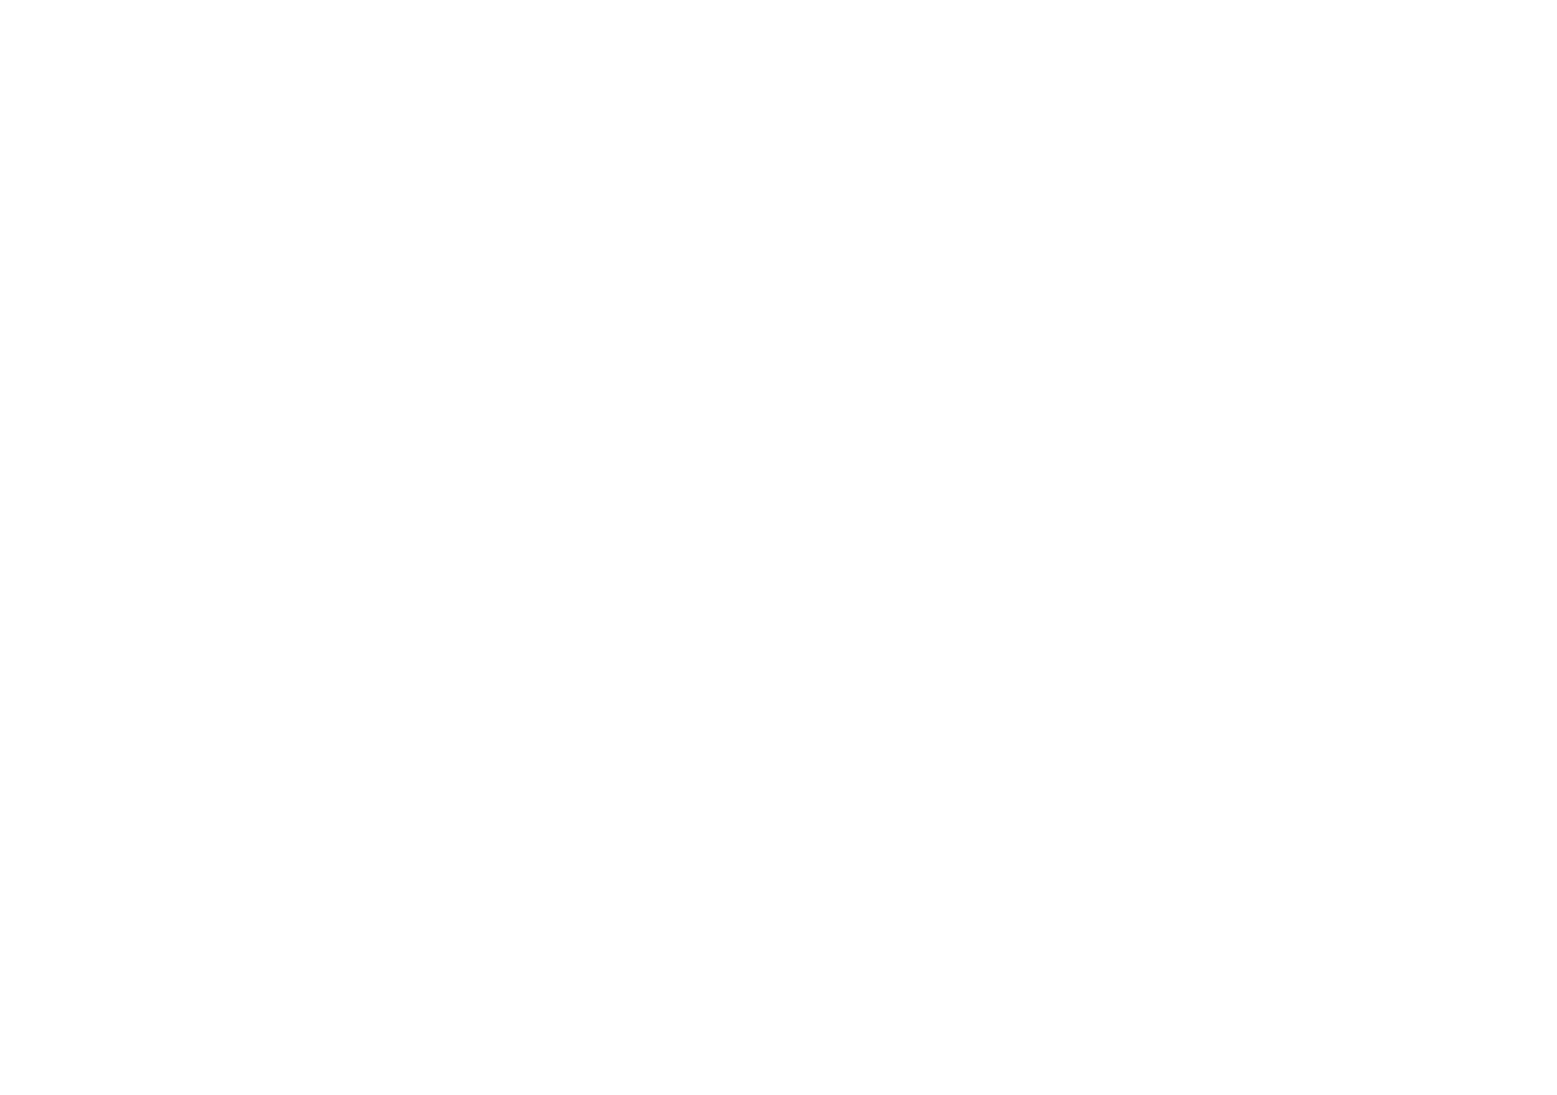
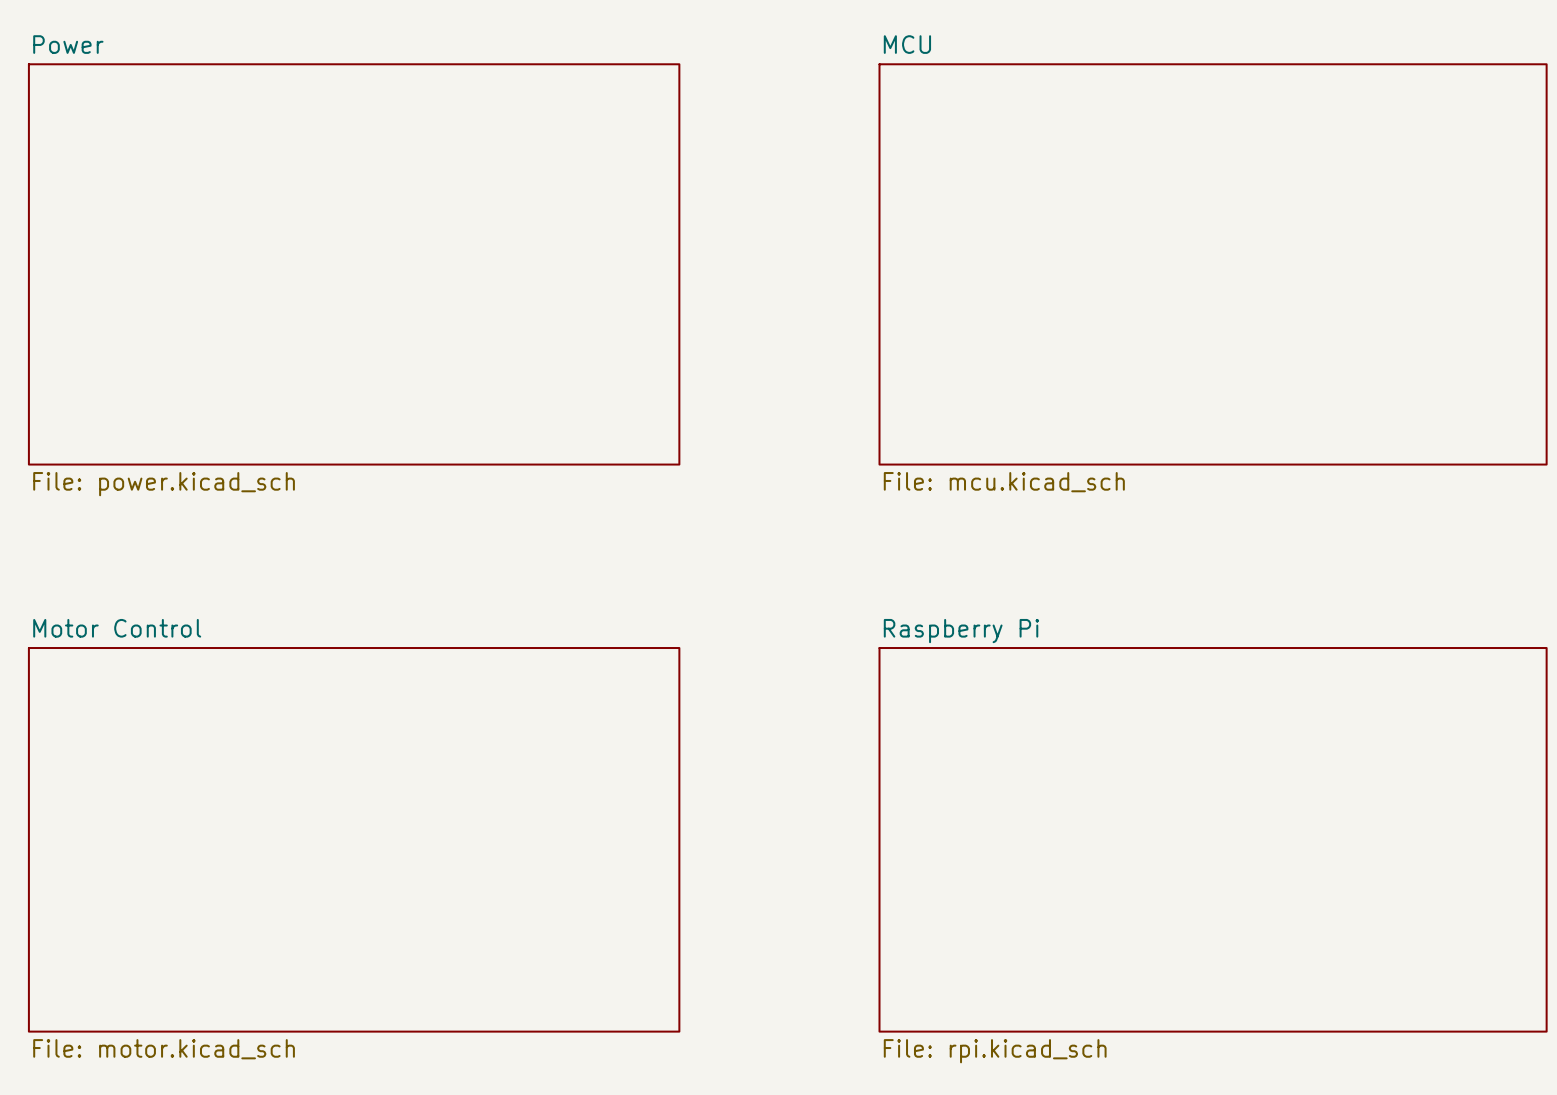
sheet Power: none -> File: power.kicad_sch (354, 264)
sheet MCU: none -> File: mcu.kicad_sch (1213, 264)
sheet Motor Control: none -> File: motor.kicad_sch (354, 839)
sheet Raspberry Pi: none -> File: rpi.kicad_sch (1213, 839)

